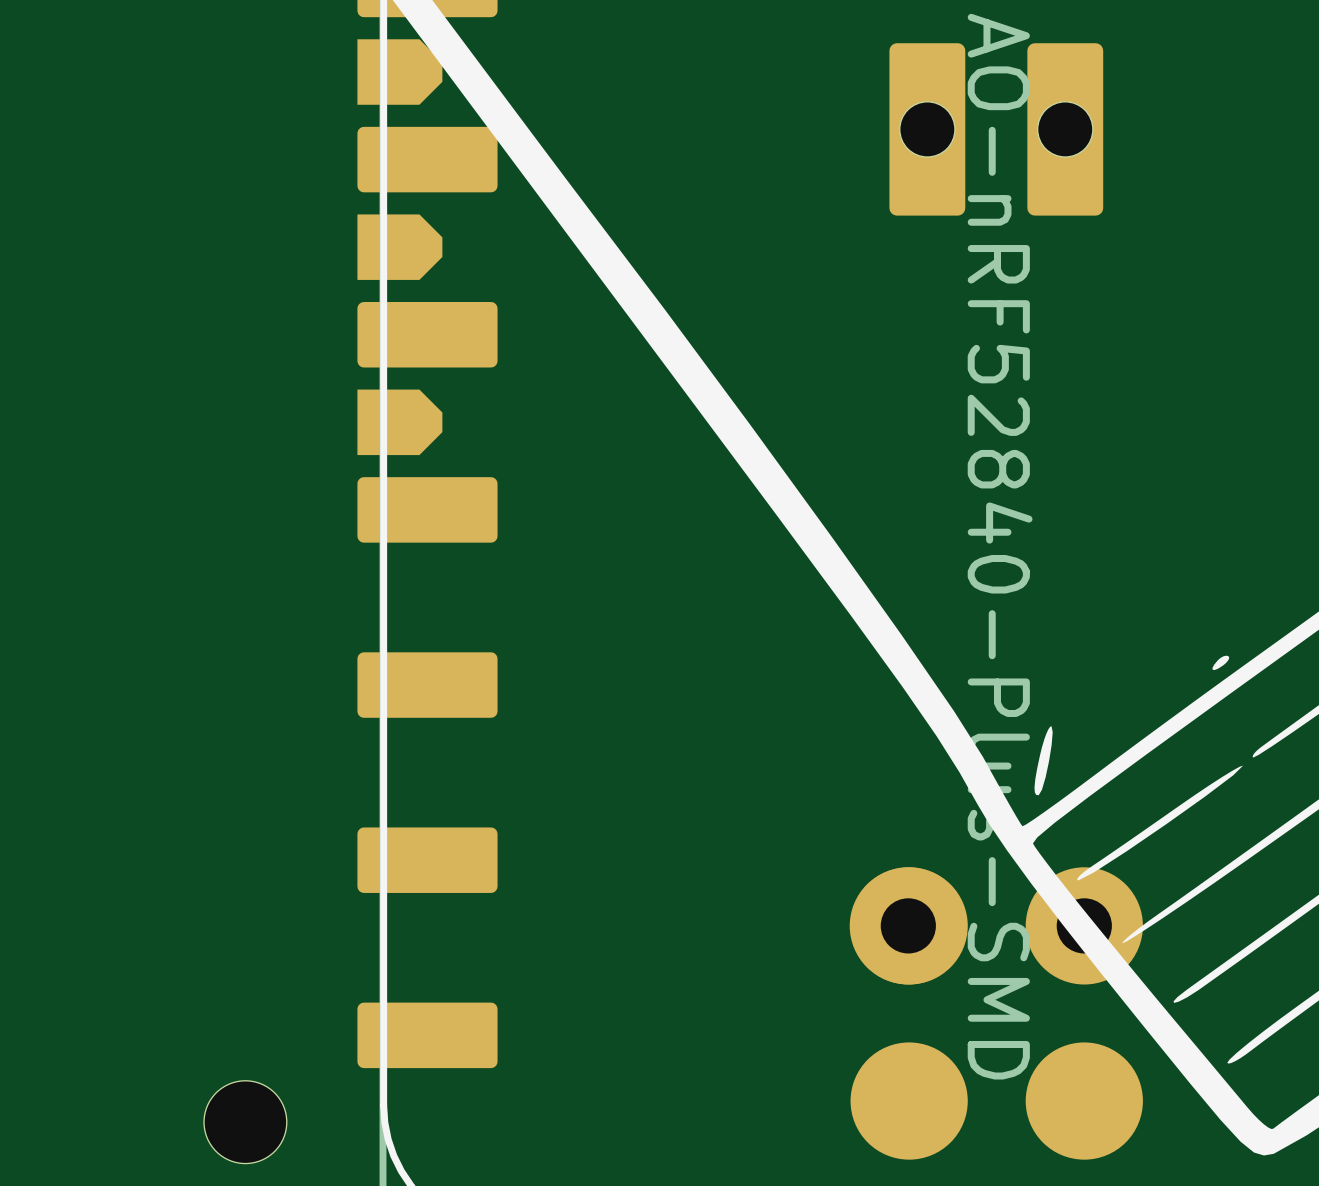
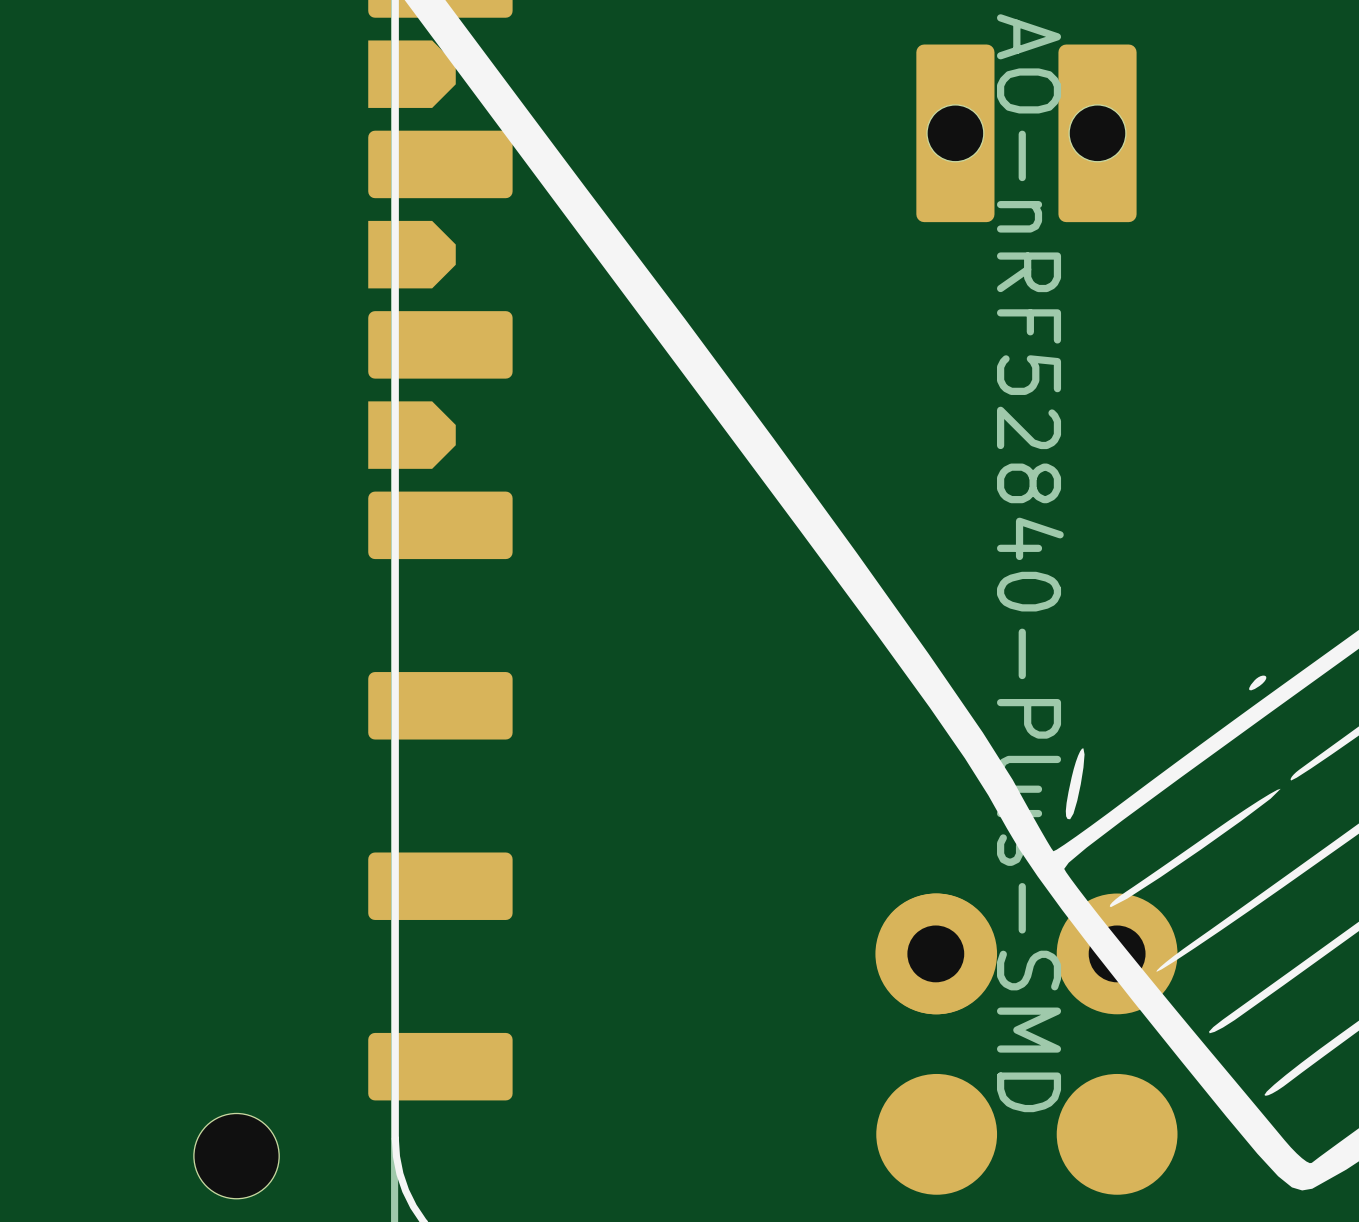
part position: (245, 1122) -> (236, 1156)

